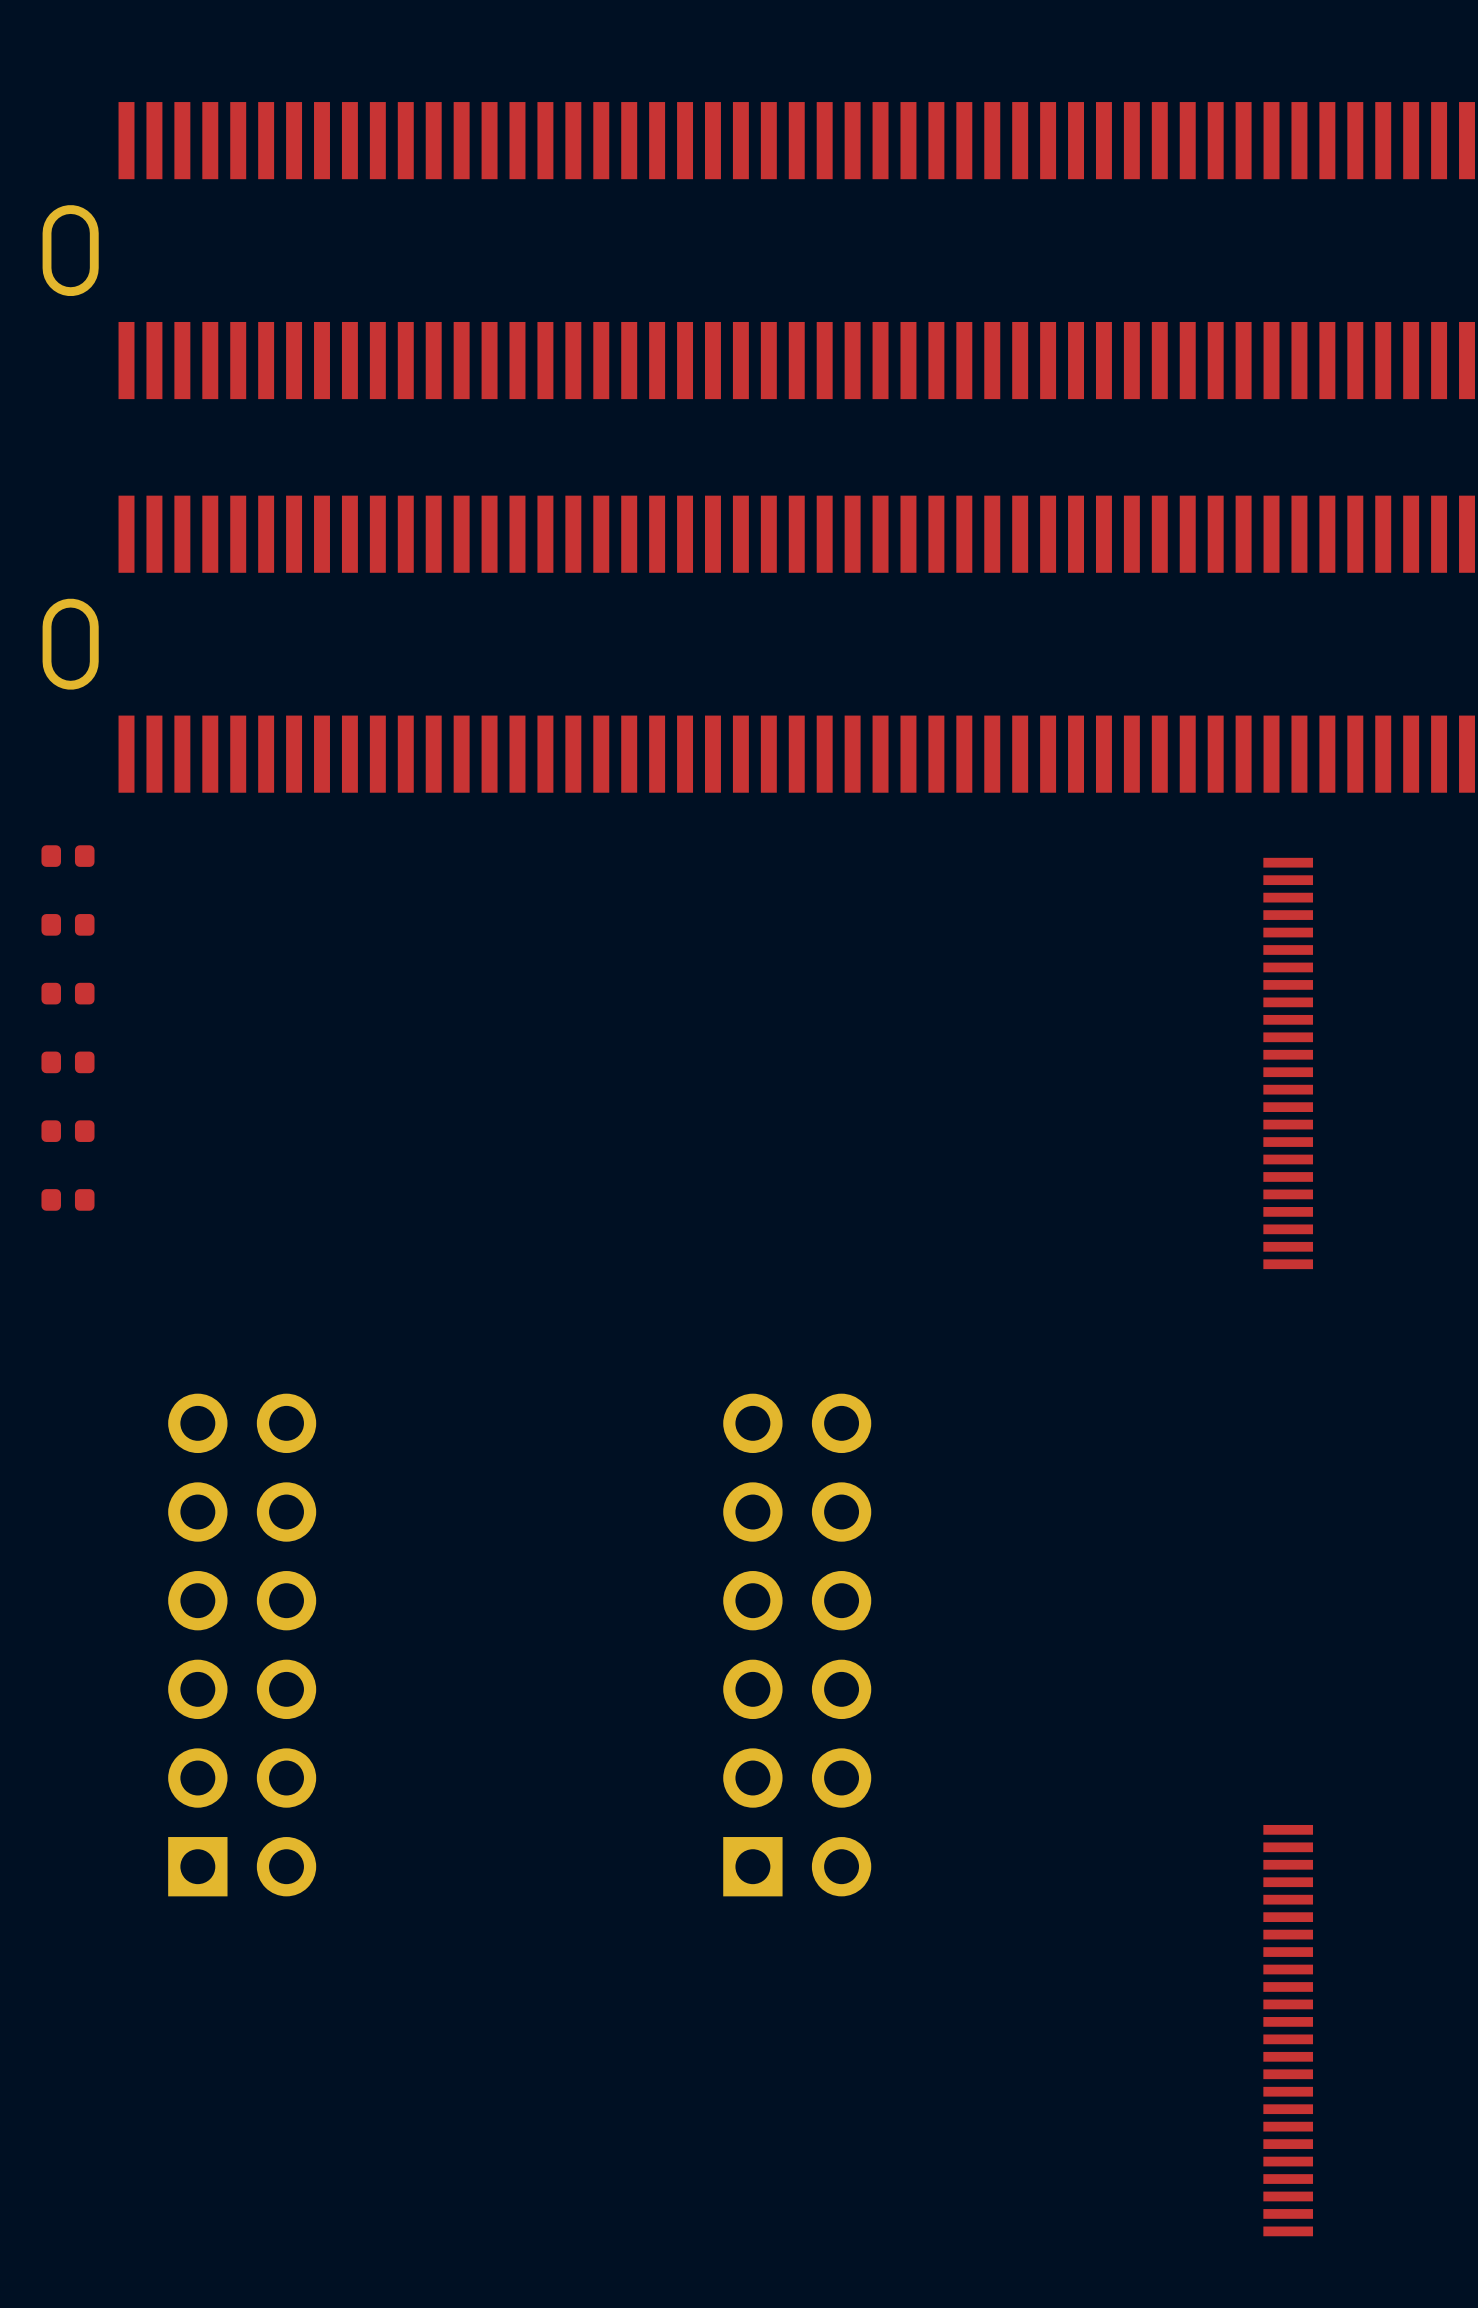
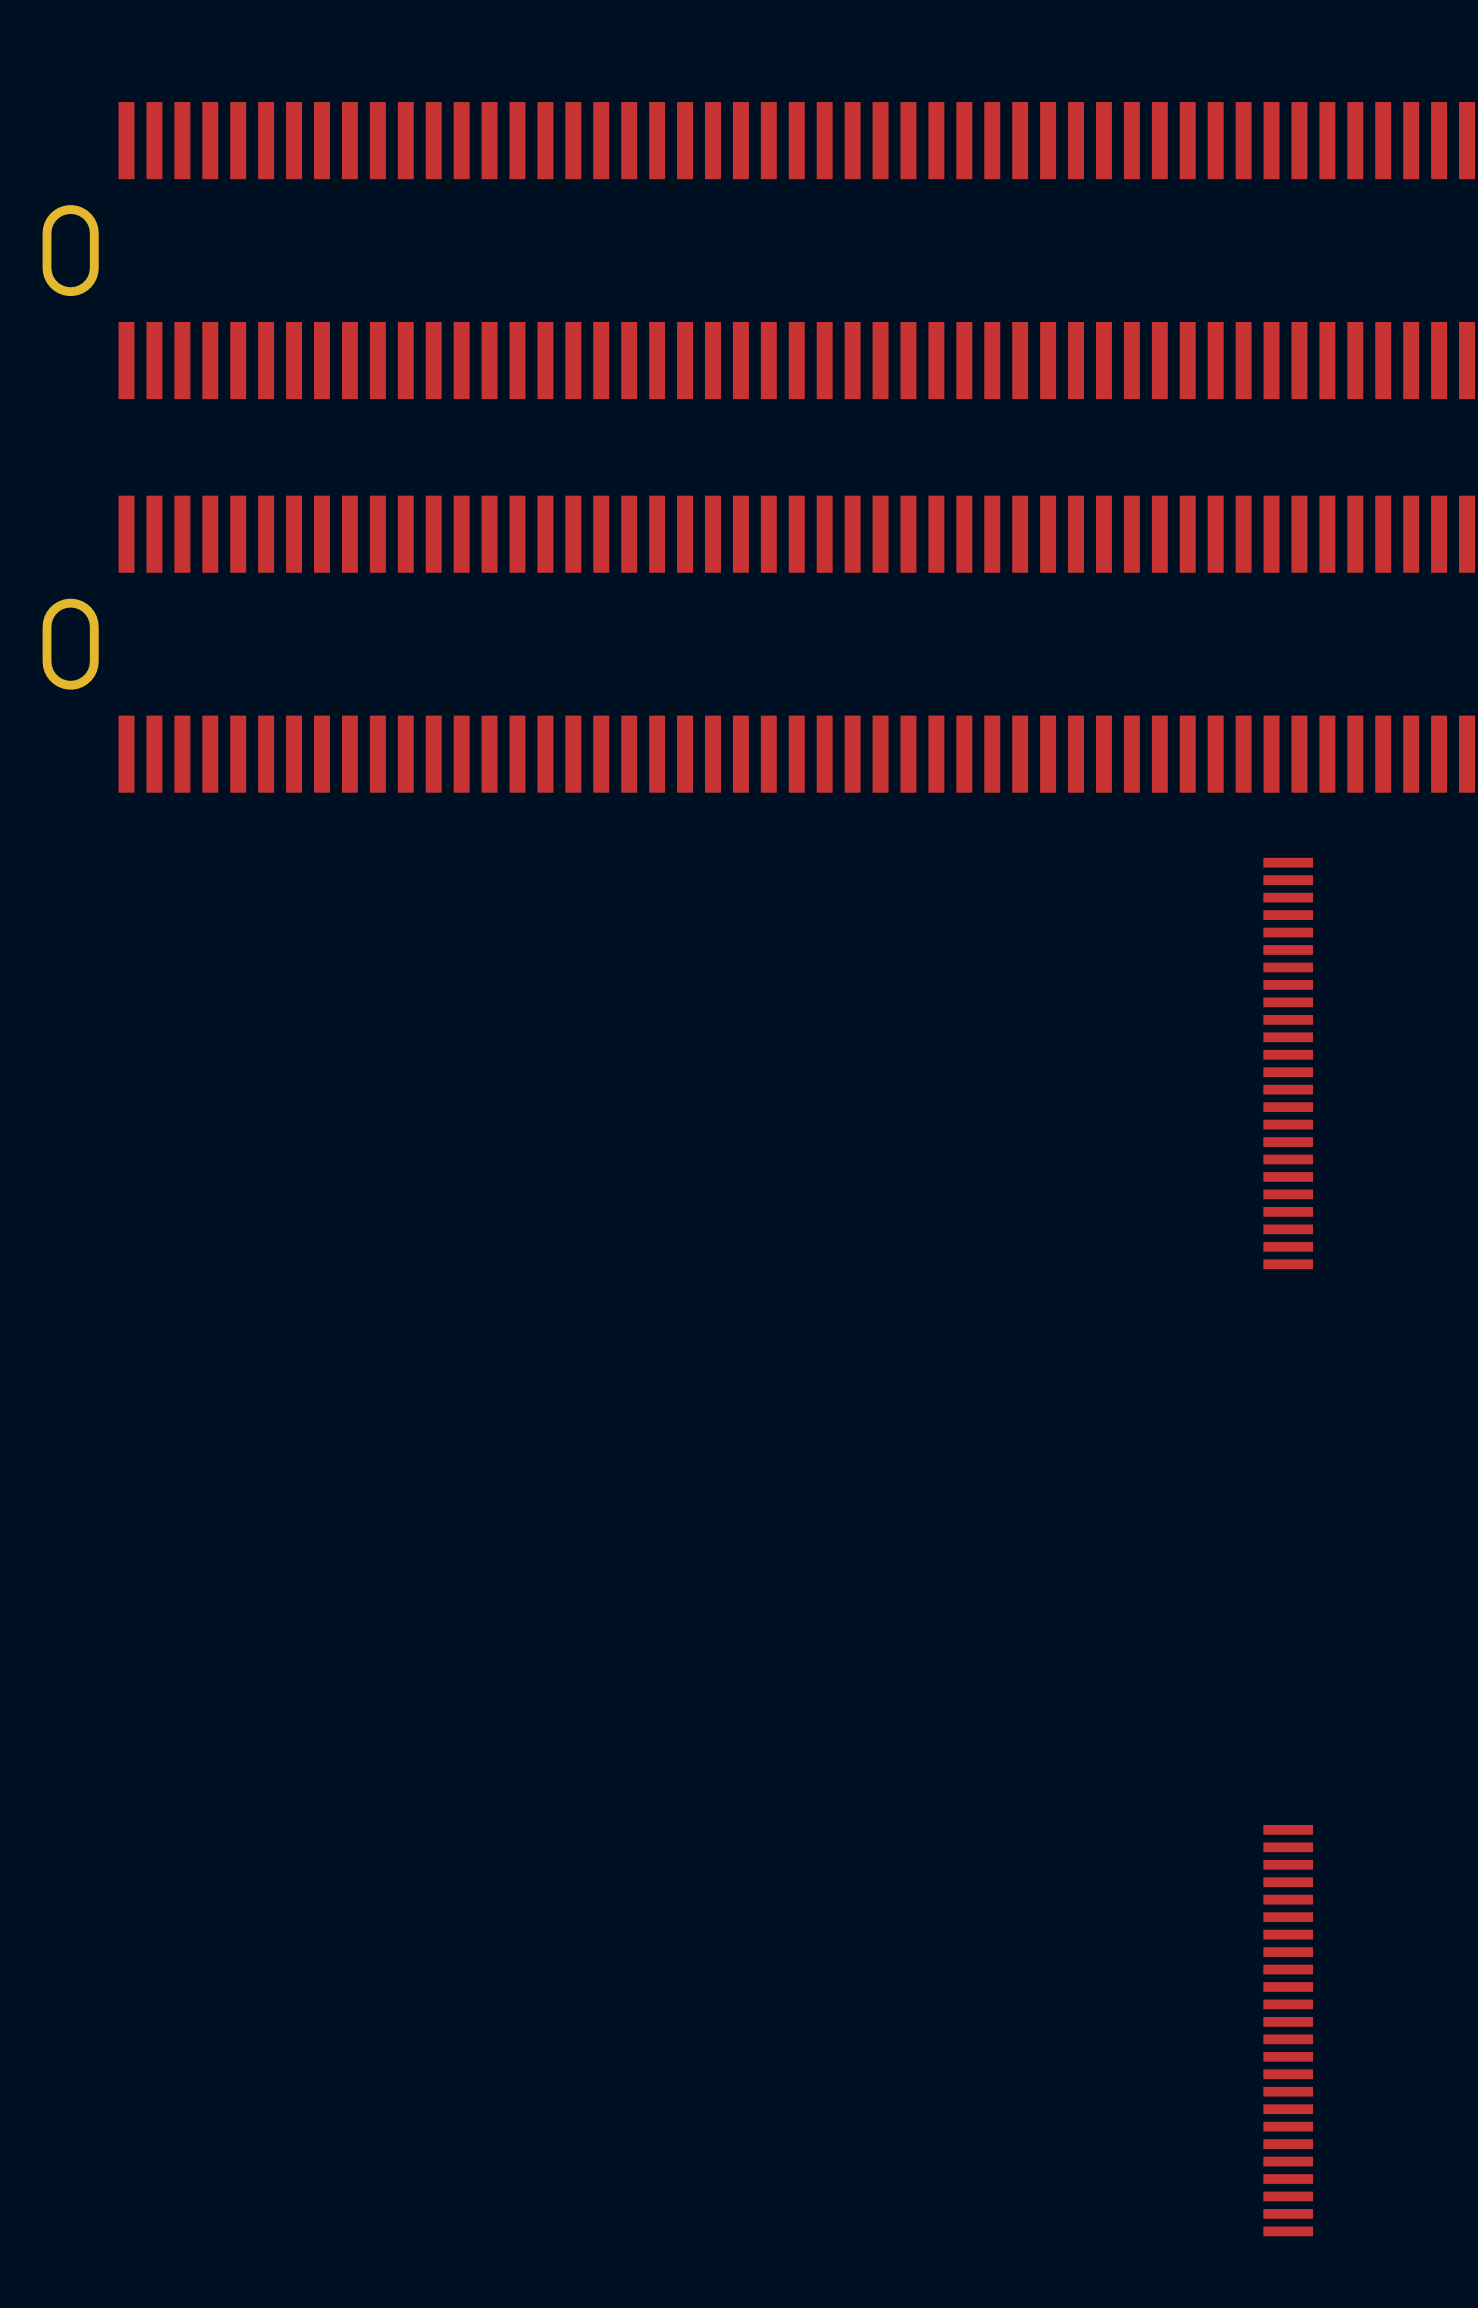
part: (67, 856) -> none
part: (67, 924) -> none
part: (67, 993) -> none
part: (67, 1062) -> none
part: (67, 1131) -> none
part: (67, 1199) -> none
part: (242, 1645) -> none
part: (797, 1645) -> none

